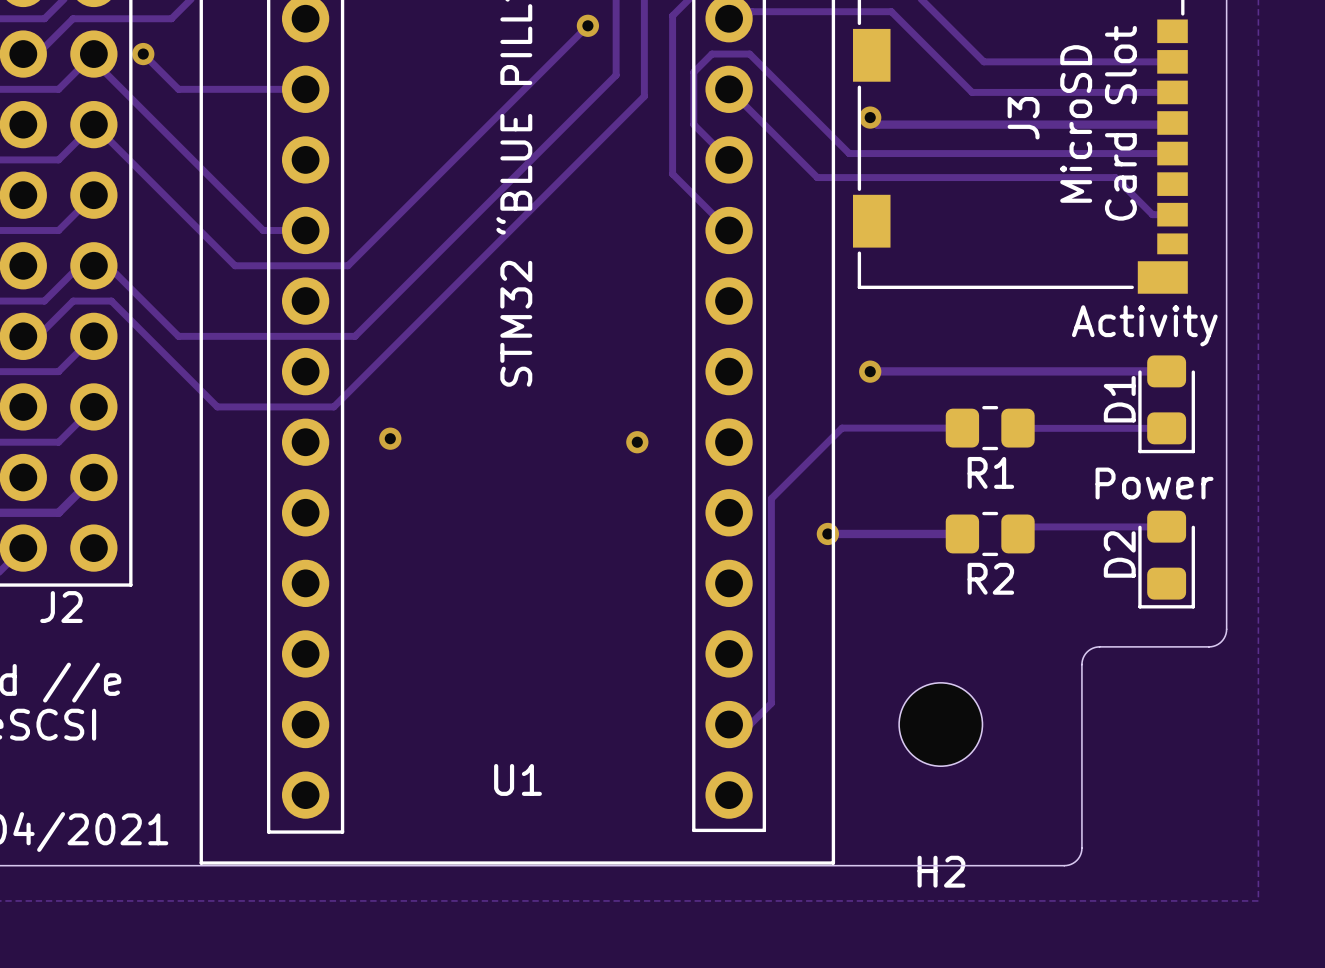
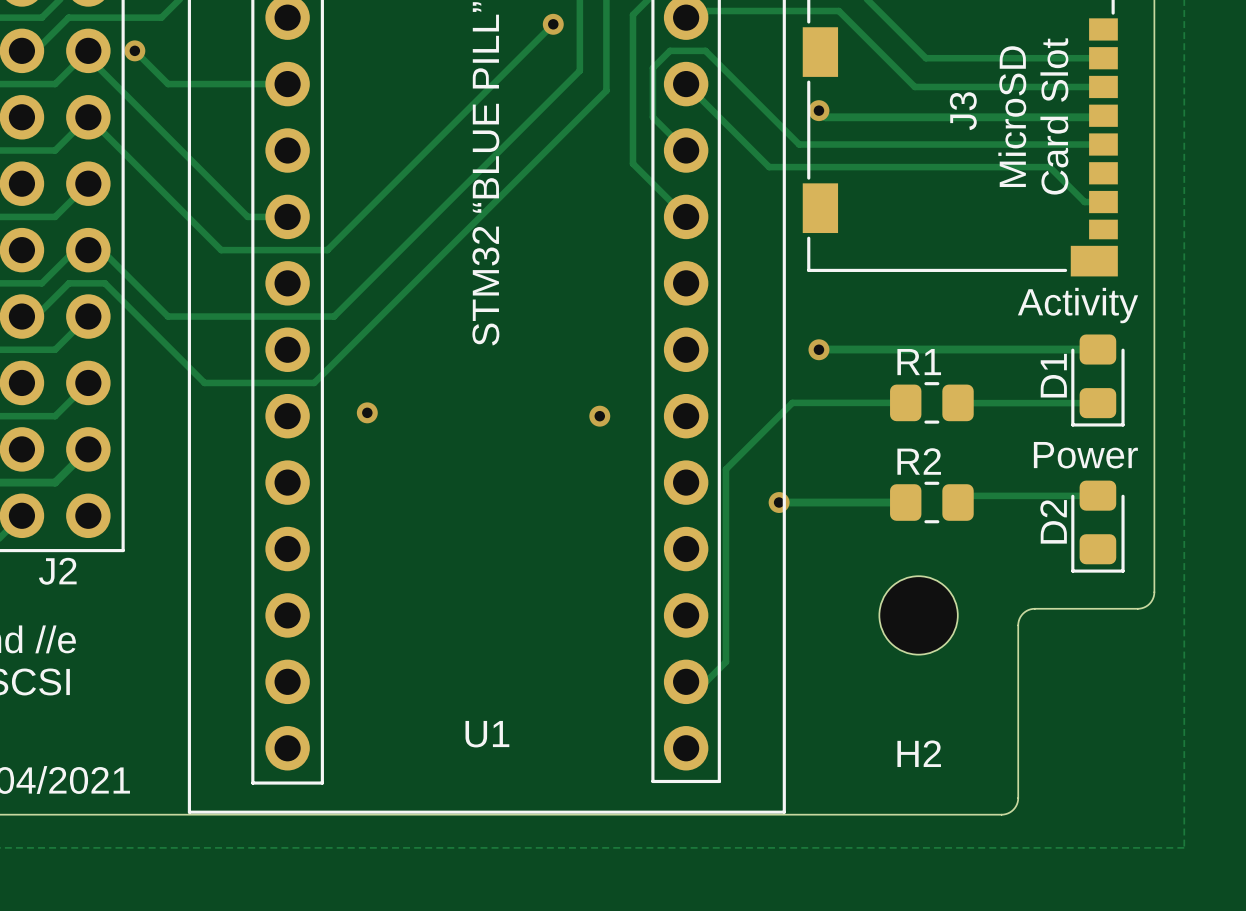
R1 name position: R1 (990, 472) -> R1 (919, 362)
R2 name position: R2 (990, 578) -> R2 (919, 461)
H2 position: (940, 724) -> (918, 615)

